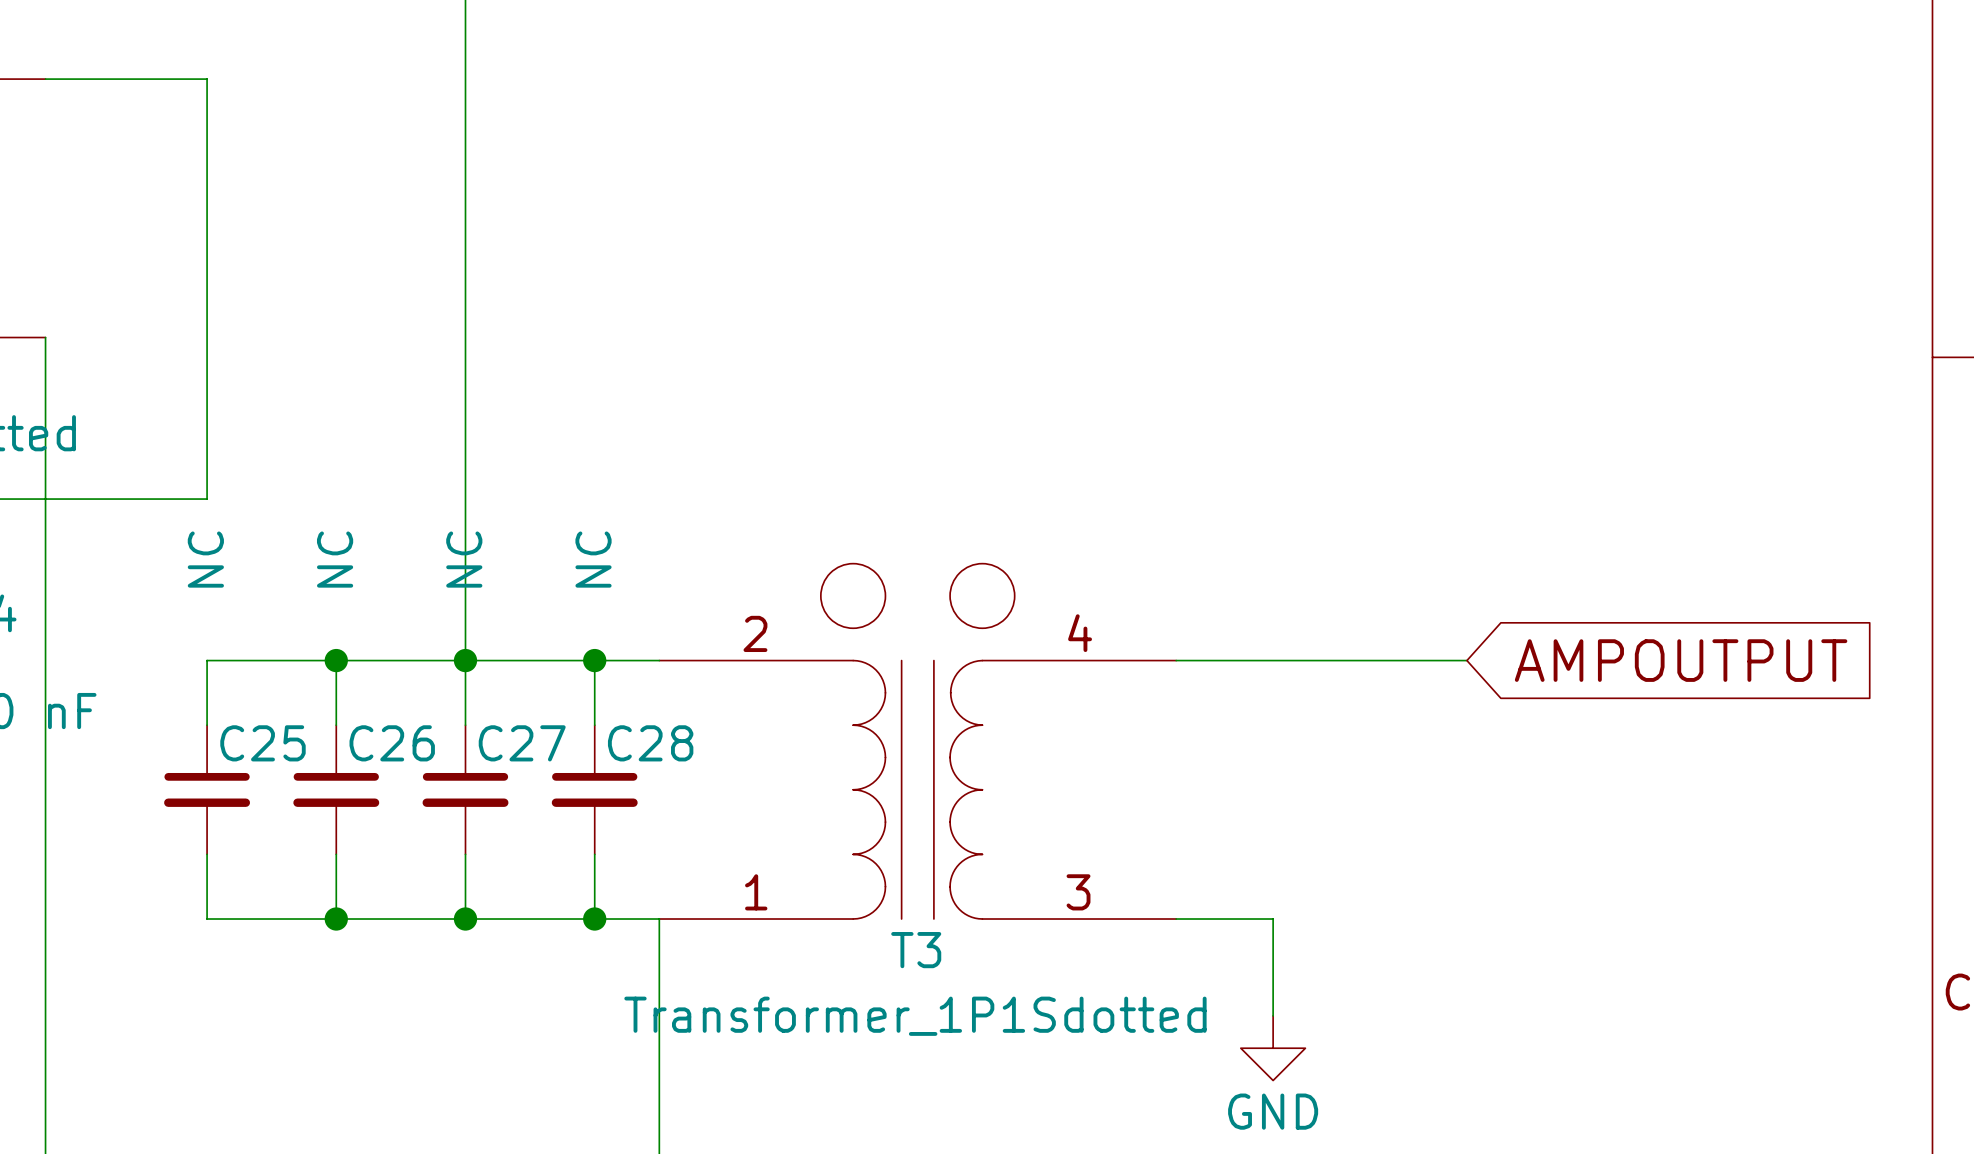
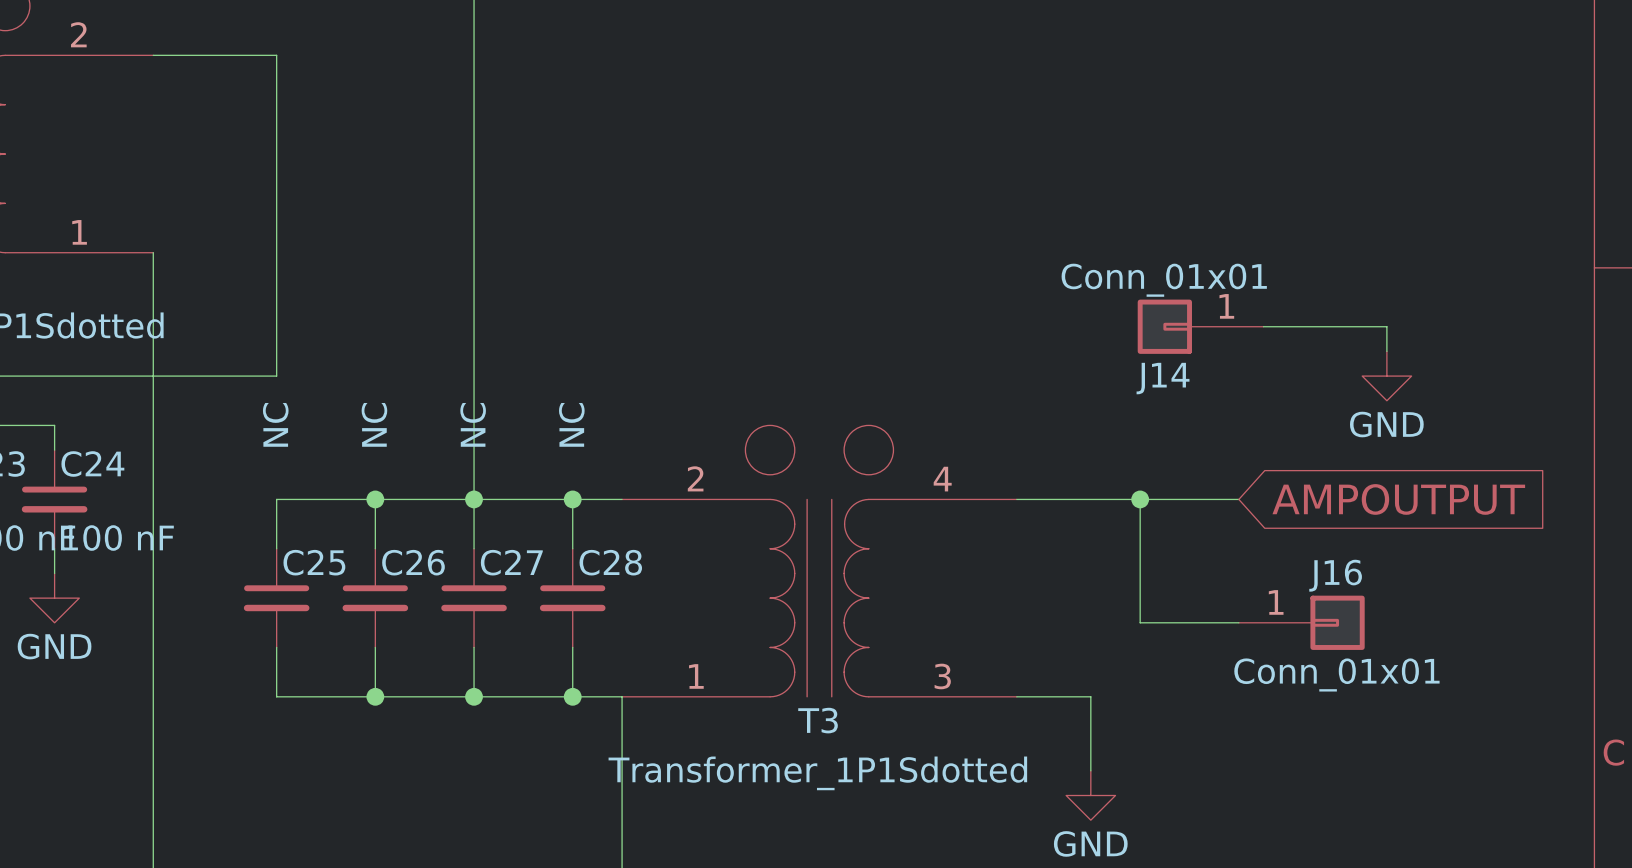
J14: none -> Conn_01x01 (1200, 326)
wire: none -> (1263, 326) (1386, 326) (1386, 351)
power symbol: none -> GND (1386, 376)
wire: none -> (1140, 499) (1140, 622) (1238, 622)
junction: none -> (1140, 499)
J16: none -> Conn_01x01 (1301, 622)

